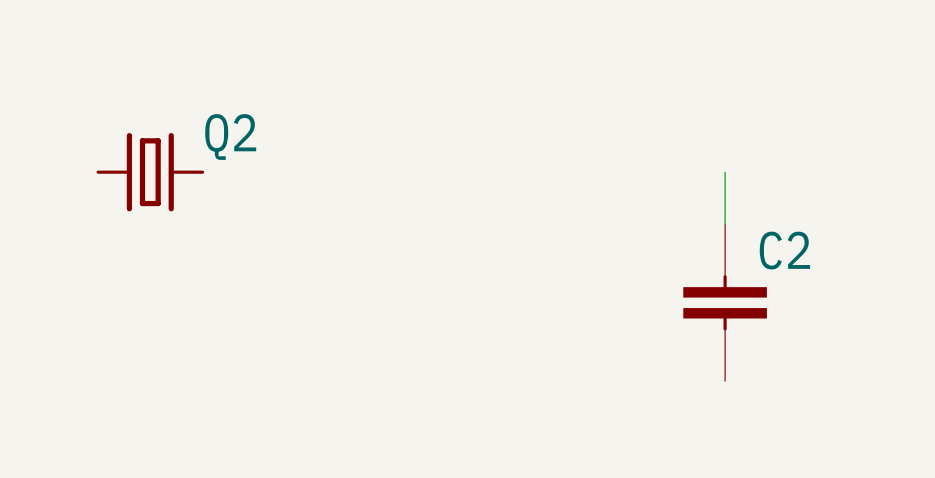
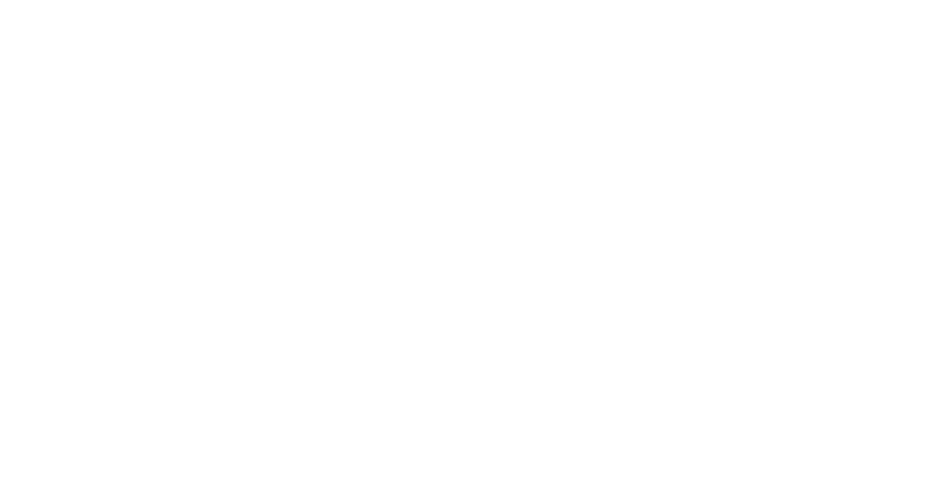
Q2: (150, 172) -> none
wire: (725, 172) (725, 224) -> none
C2: (725, 302) -> none

